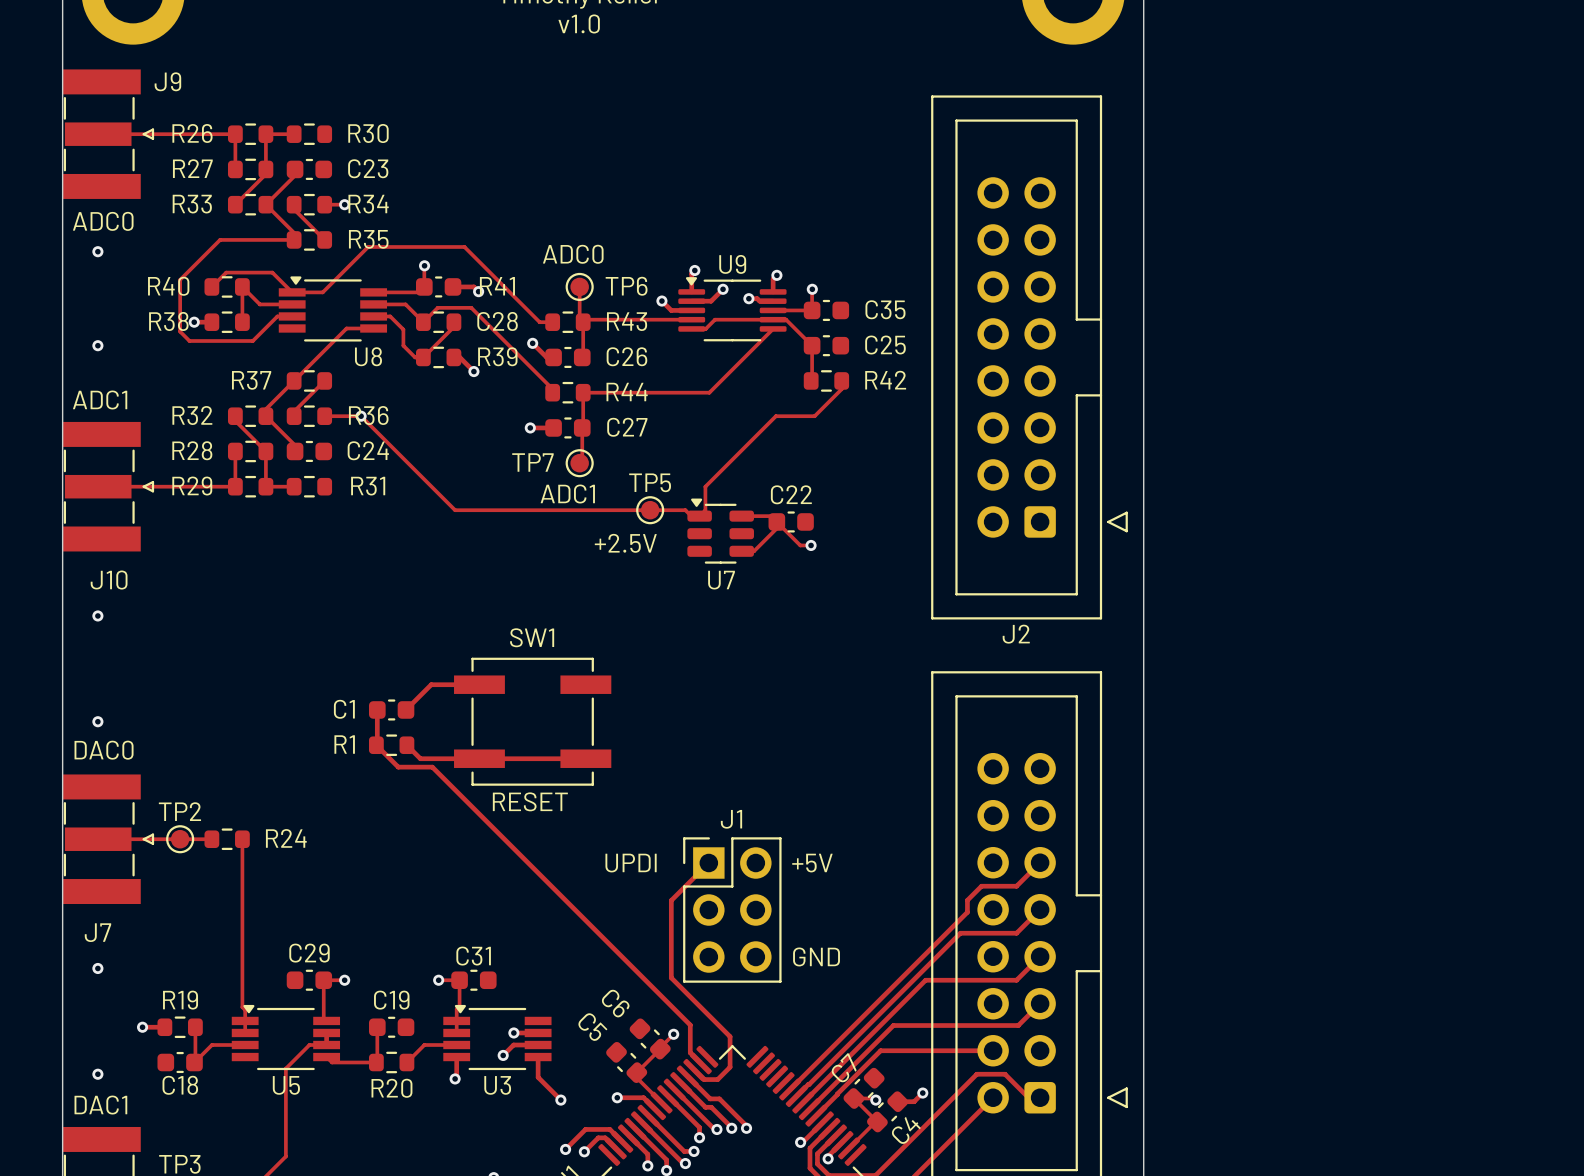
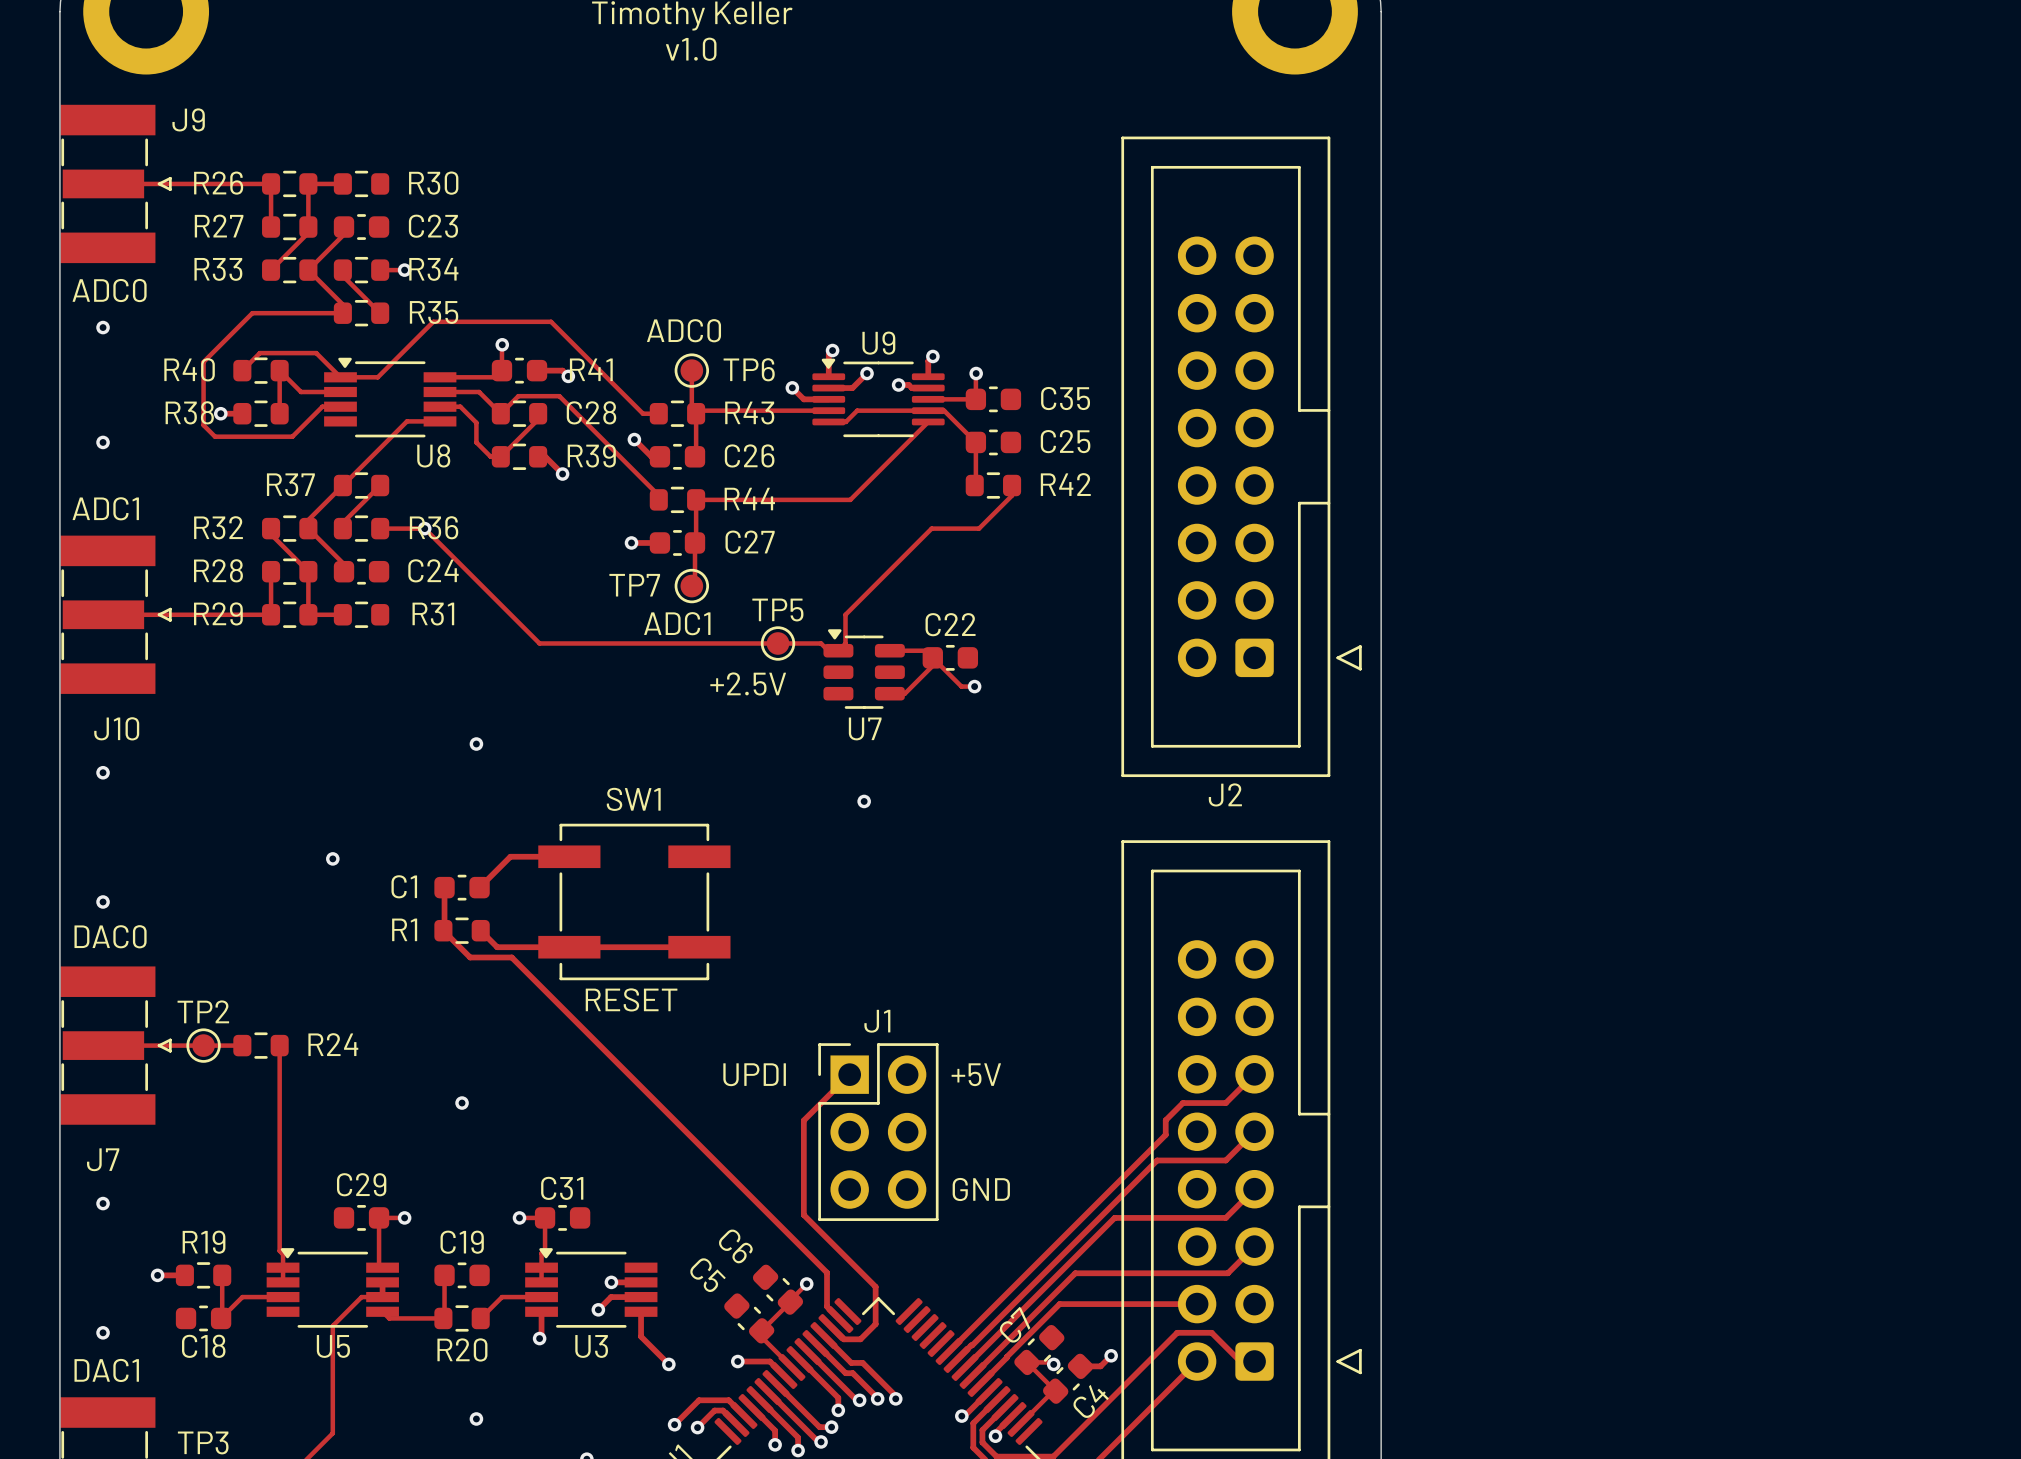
via: none -> (476, 744)
via: none -> (864, 801)
via: none -> (332, 858)
via: none -> (462, 1103)
via: none -> (476, 1418)

